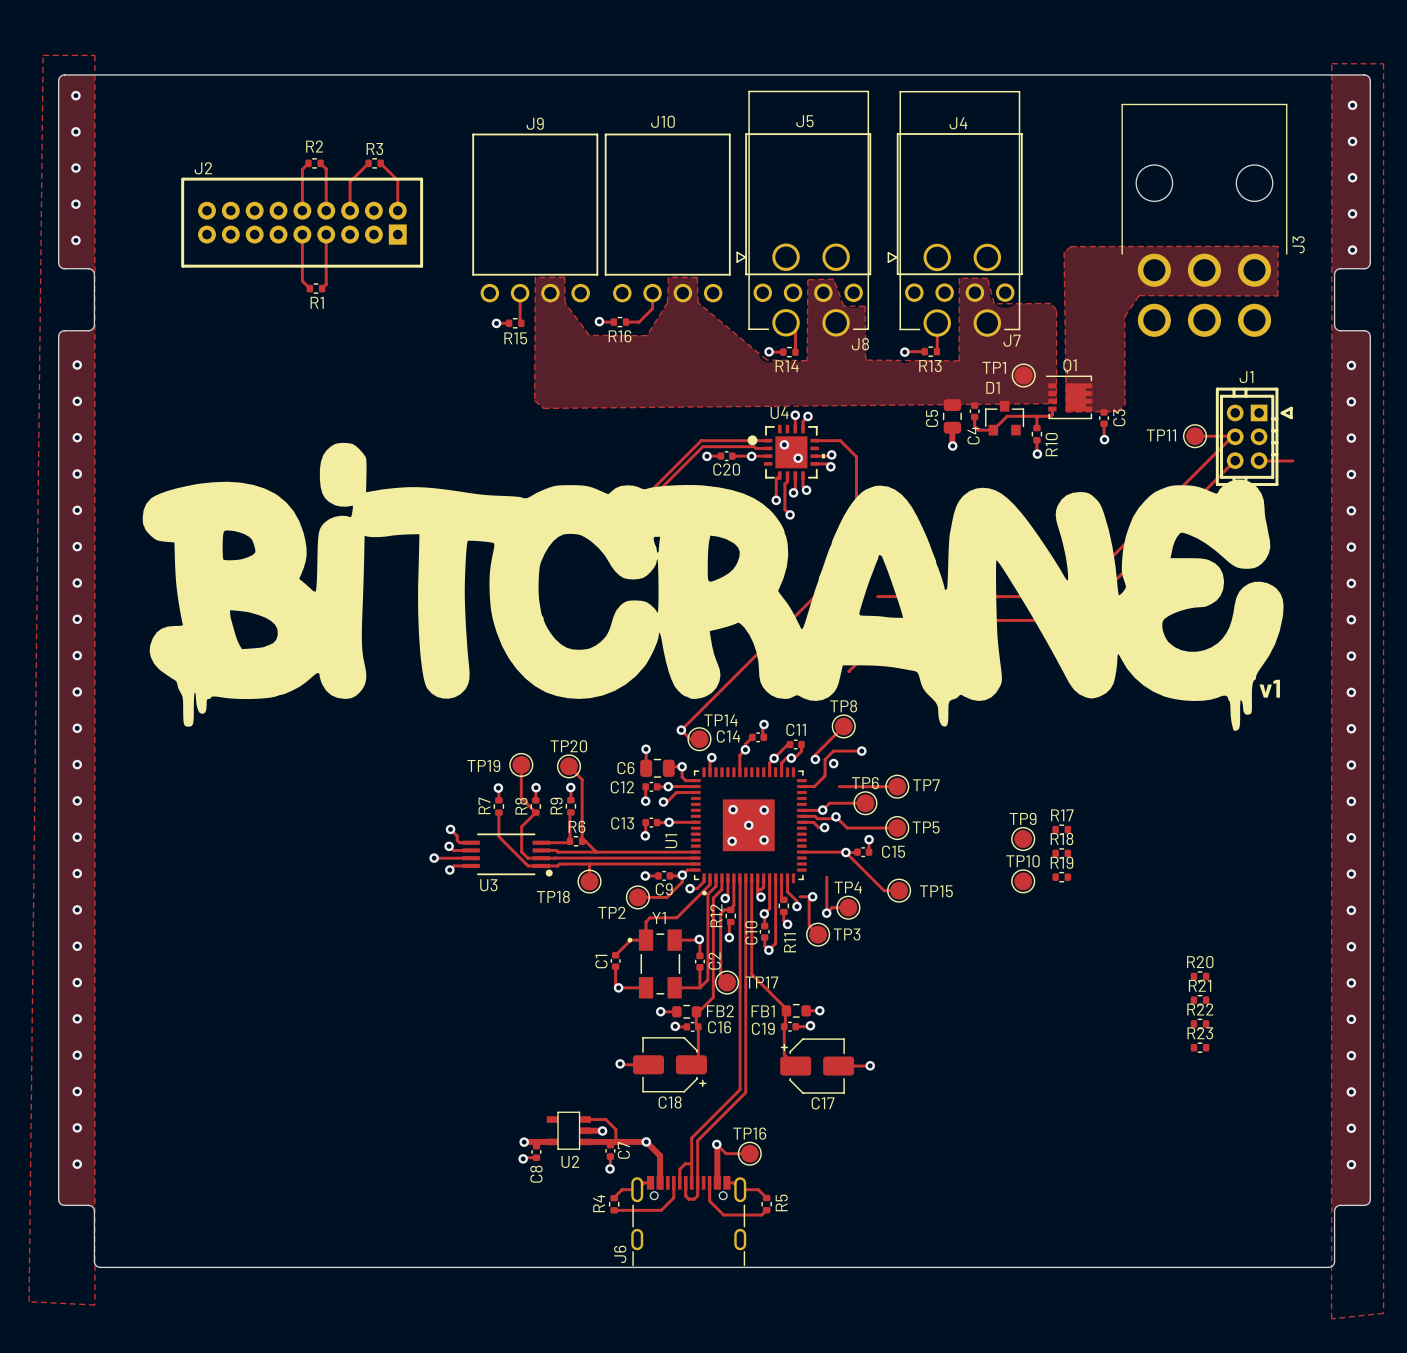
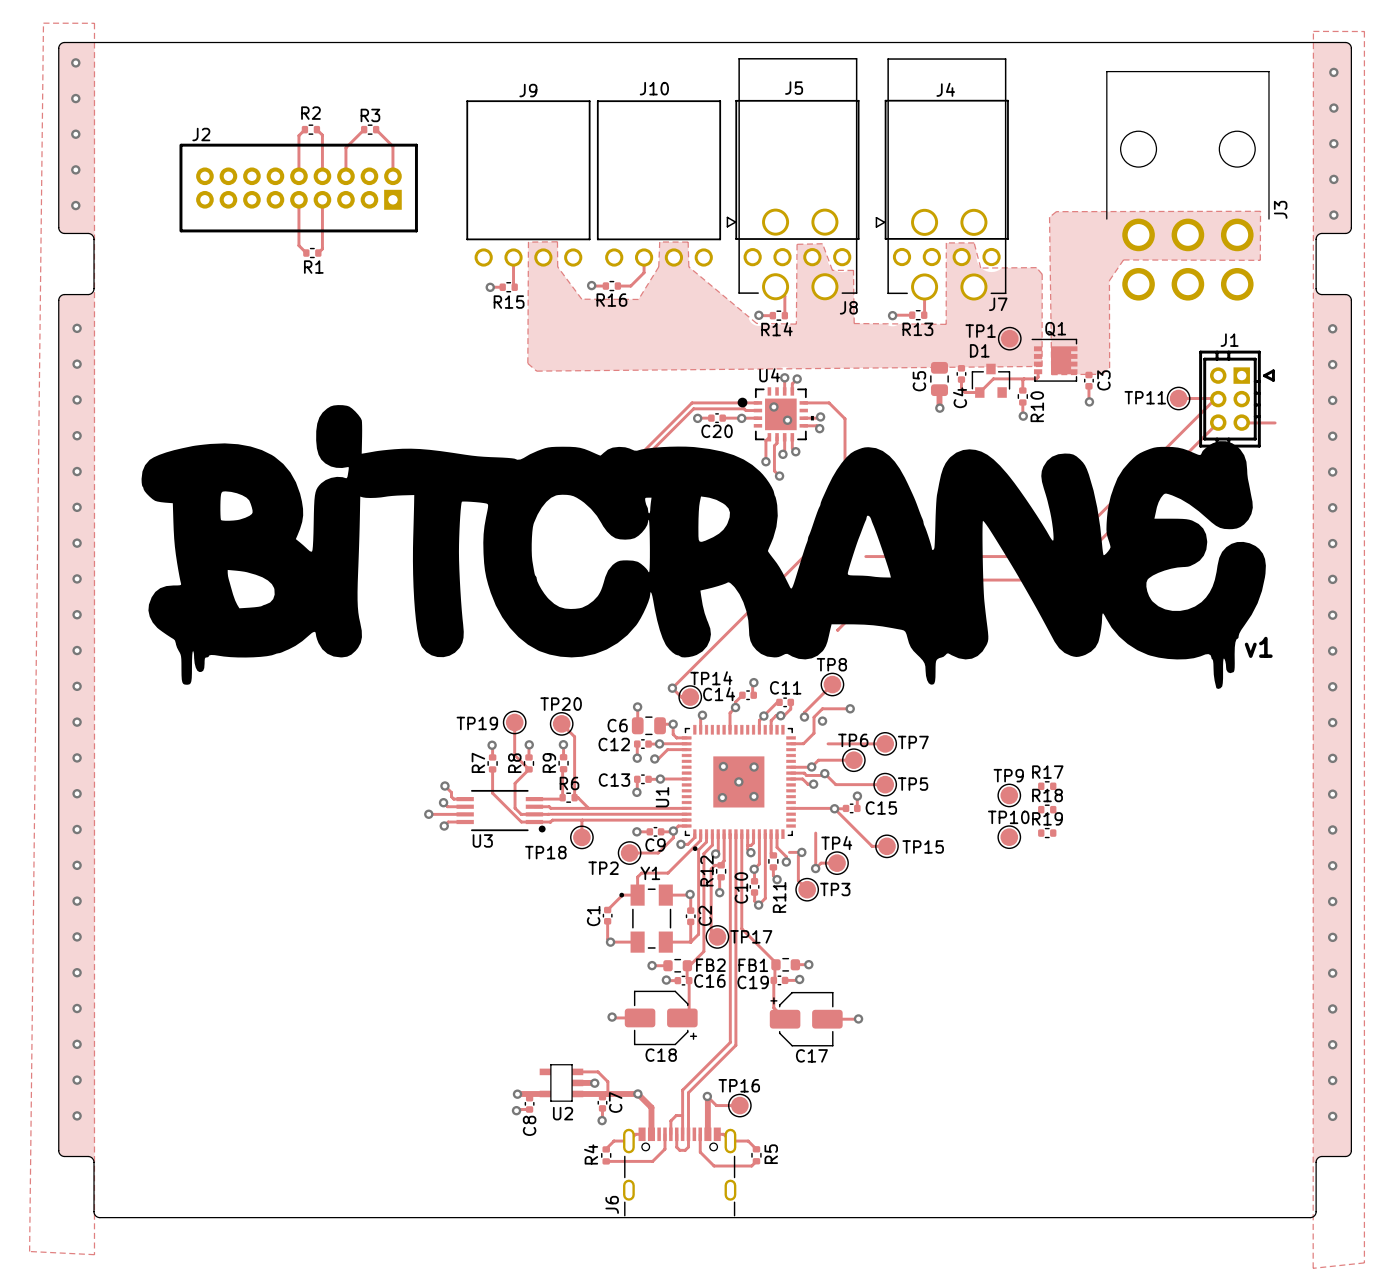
R20: (1200, 976) -> none
R21: (1200, 1000) -> none
R22: (1200, 1023) -> none
R23: (1200, 1047) -> none

